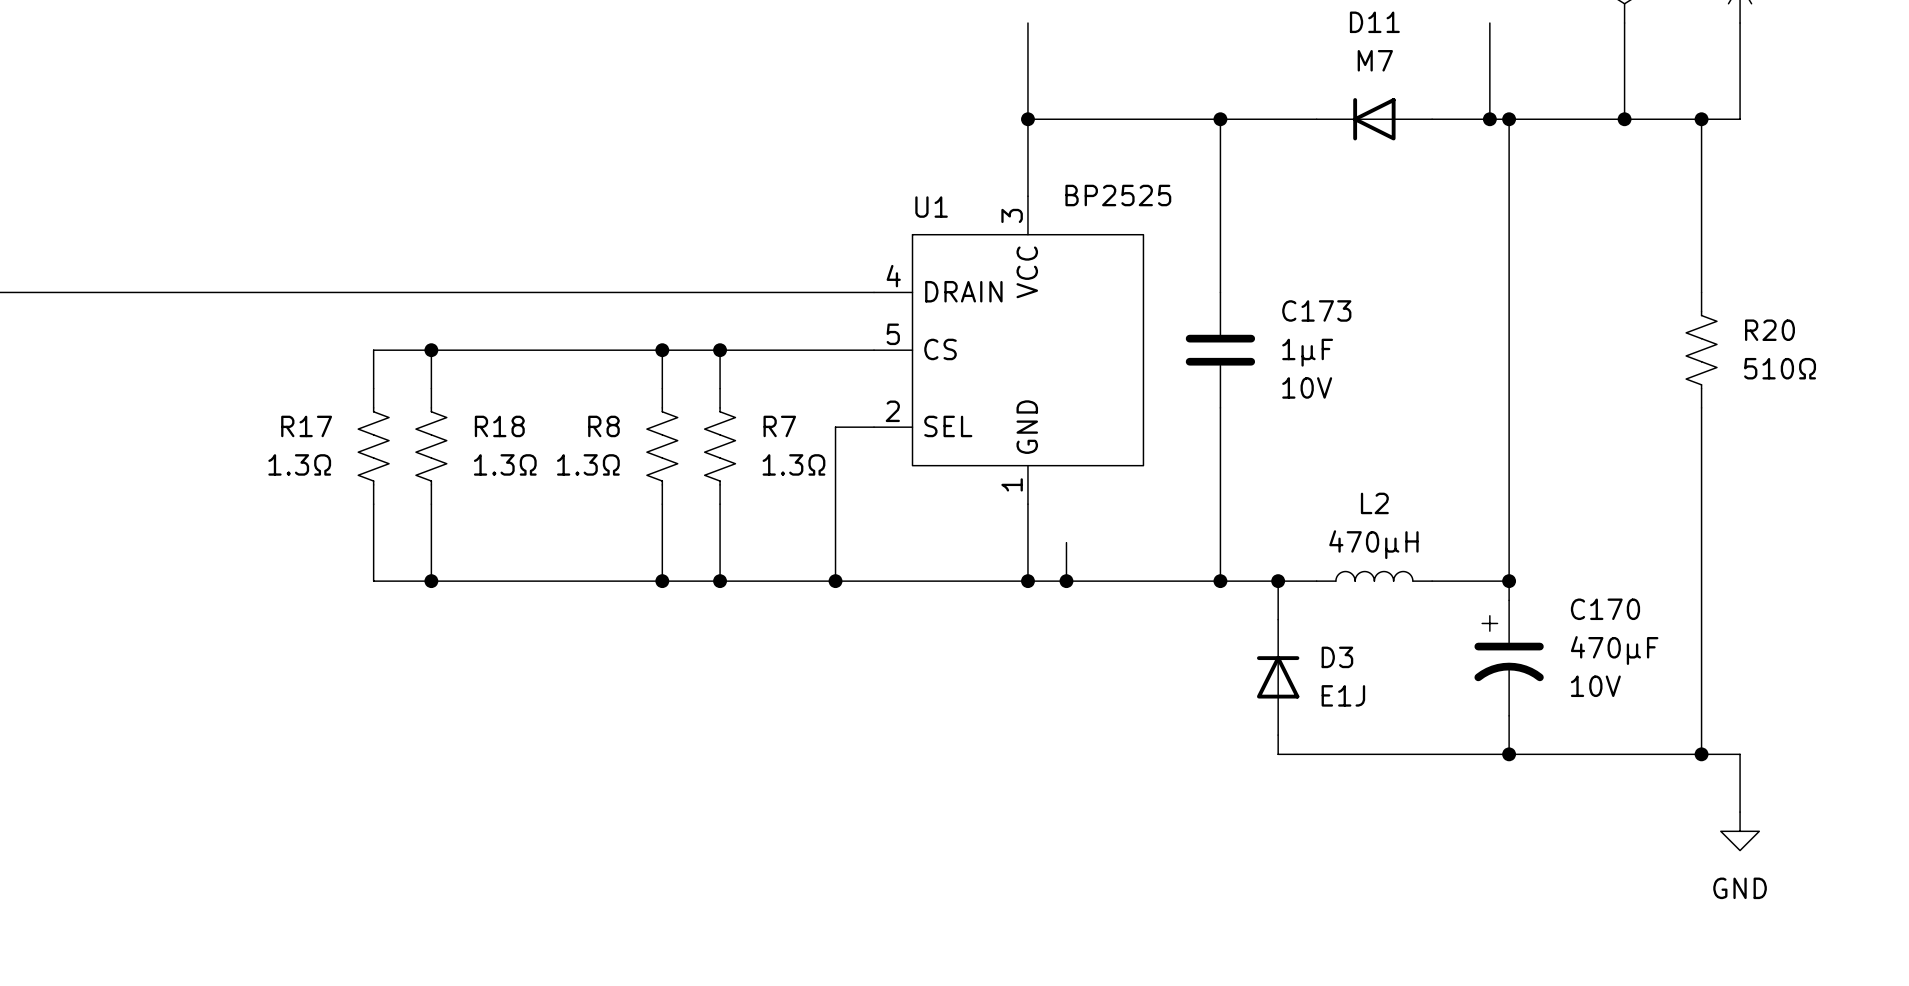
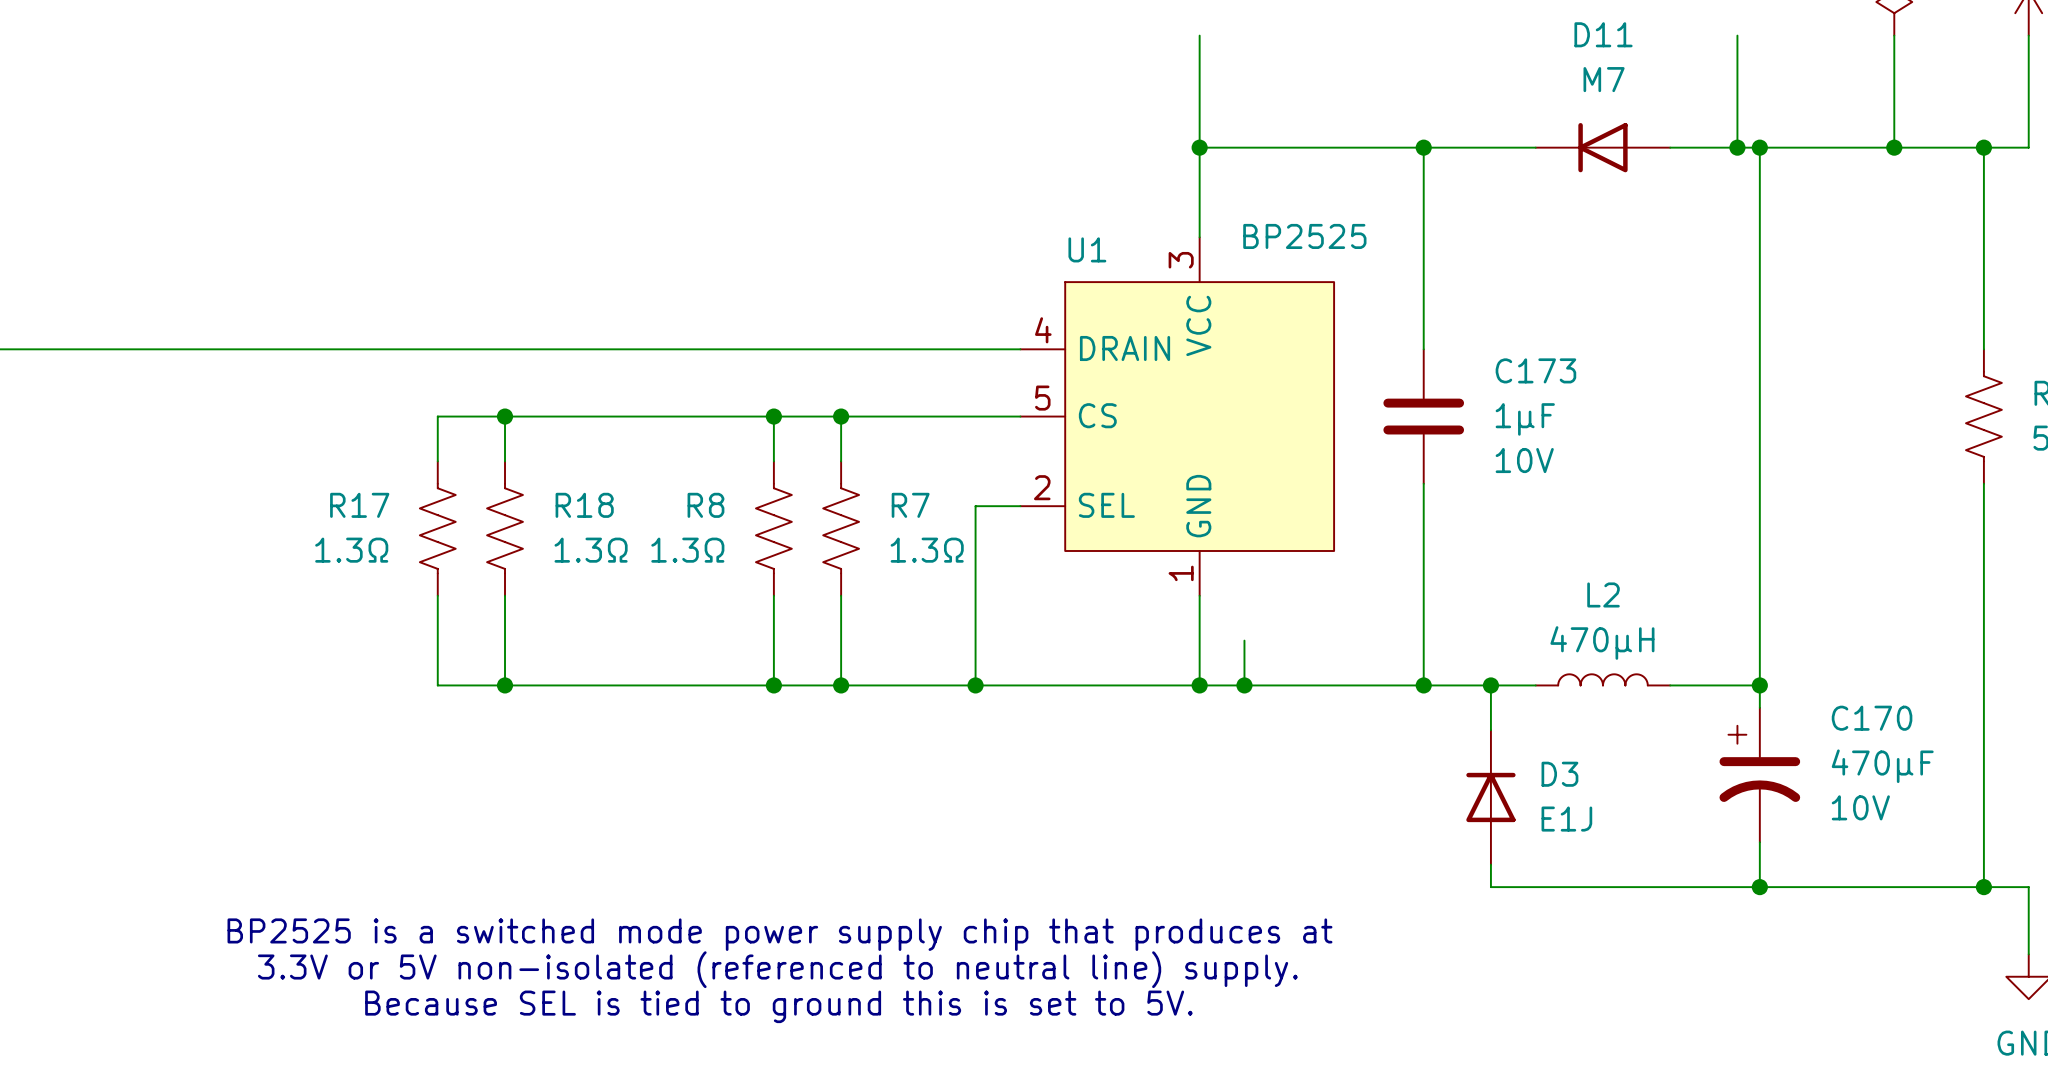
text: none -> BP2525 is a switched mode power supply chip that produces at (779, 934)
text: none -> 3.3V or 5V non-isolated (referenced to neutral line) supply. (777, 969)
text: none -> Because SEL is tied to ground this is set to 5V. (778, 1006)

